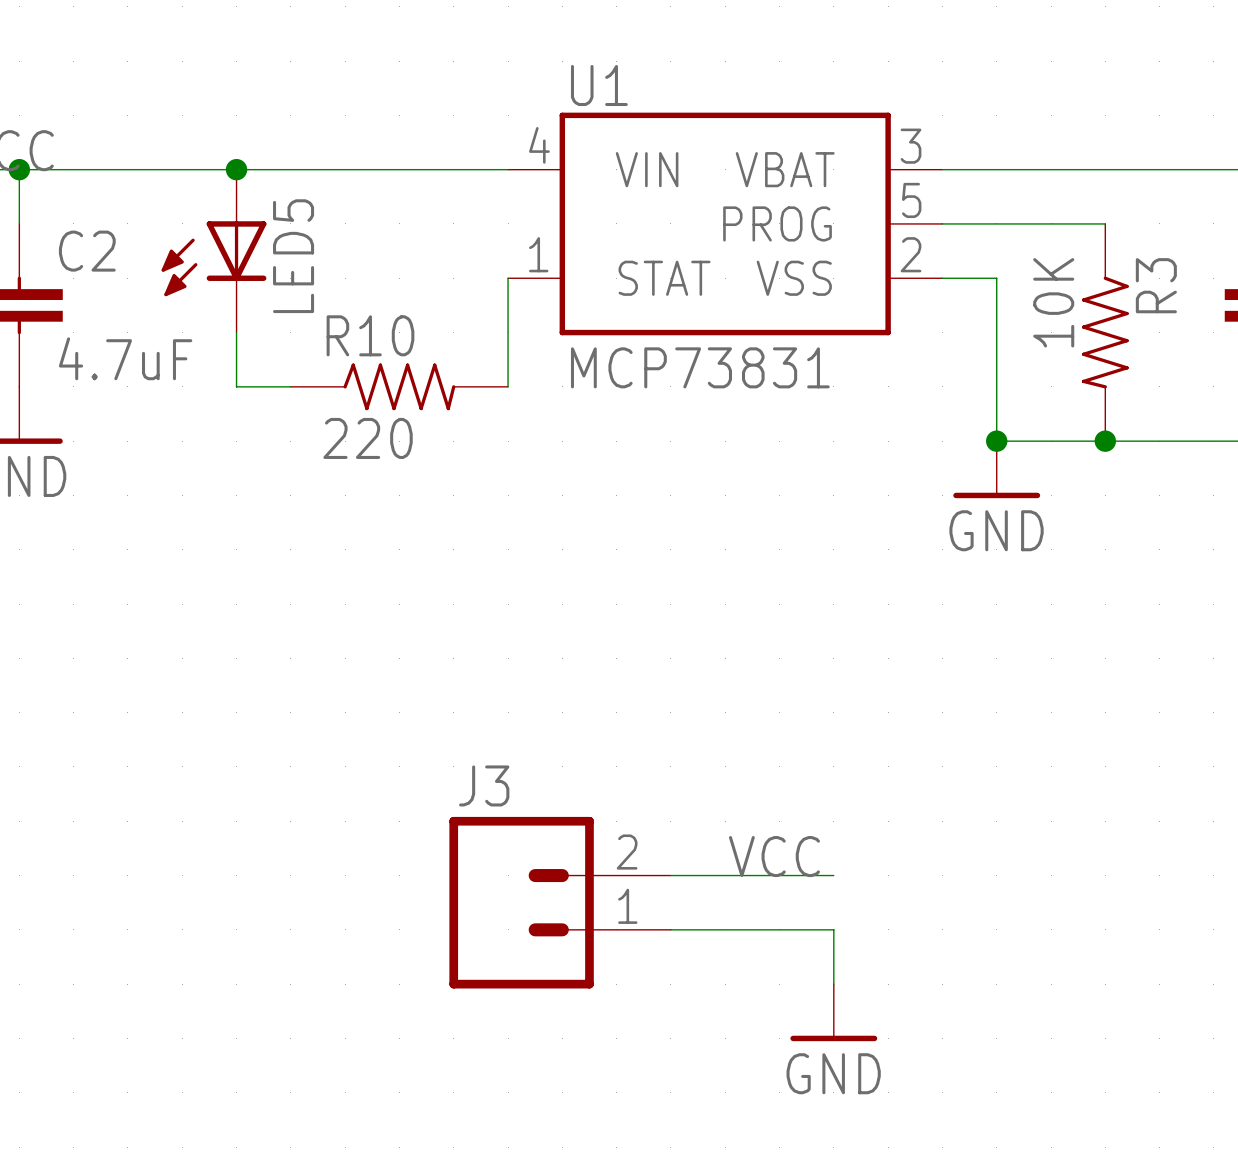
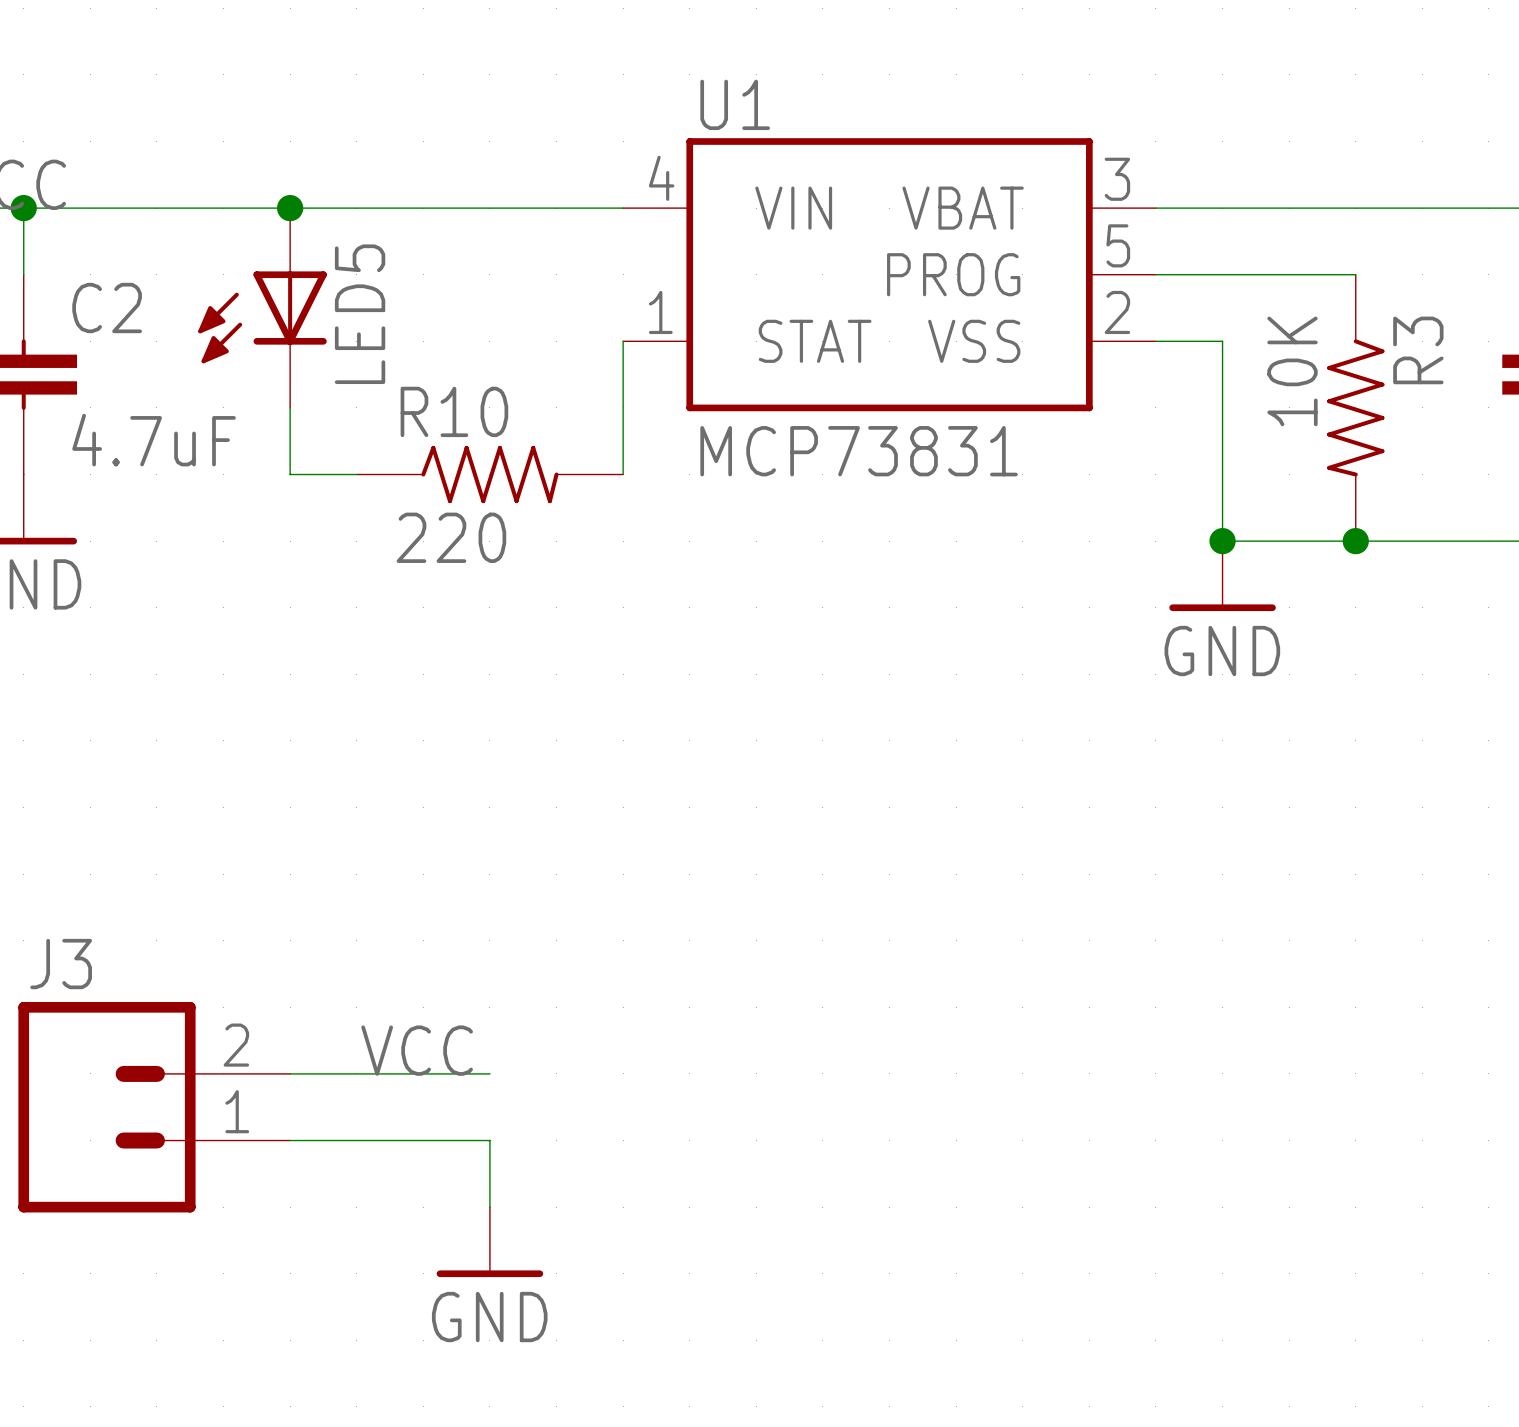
label position: VCC (774, 856) -> VCC (417, 1050)
wire: (670, 875) (833, 875) -> (290, 1073) (489, 1073)
J3 position: (560, 902) -> (154, 1107)
wire: (670, 929) (833, 929) (833, 984) -> (290, 1140) (489, 1140) (489, 1207)
power symbol position: GND (833, 1012) -> GND (489, 1242)

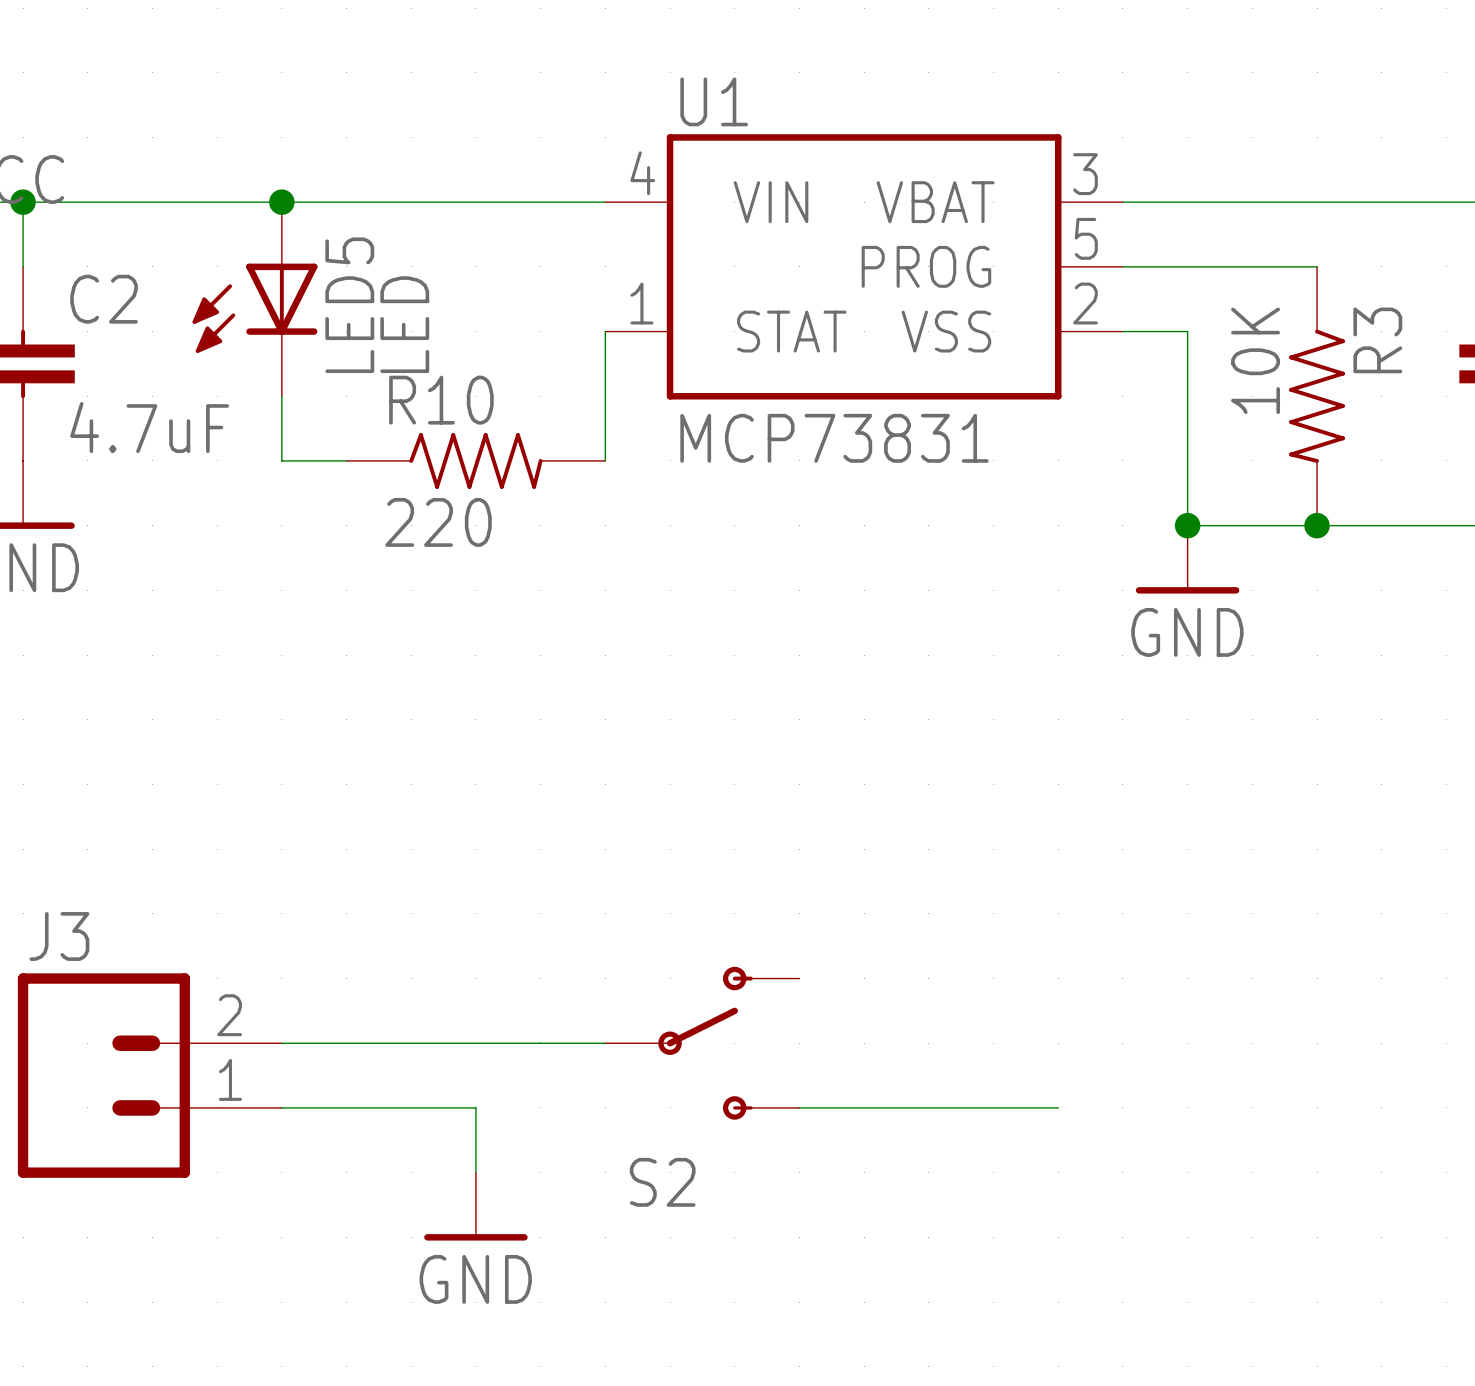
LED5 value: none -> LED (404, 324)
label: VCC (417, 1050) -> none
wire: none -> (475, 1043) (605, 1043)
S2: none -> (702, 1043)
wire: none -> (799, 1107) (1058, 1107)

